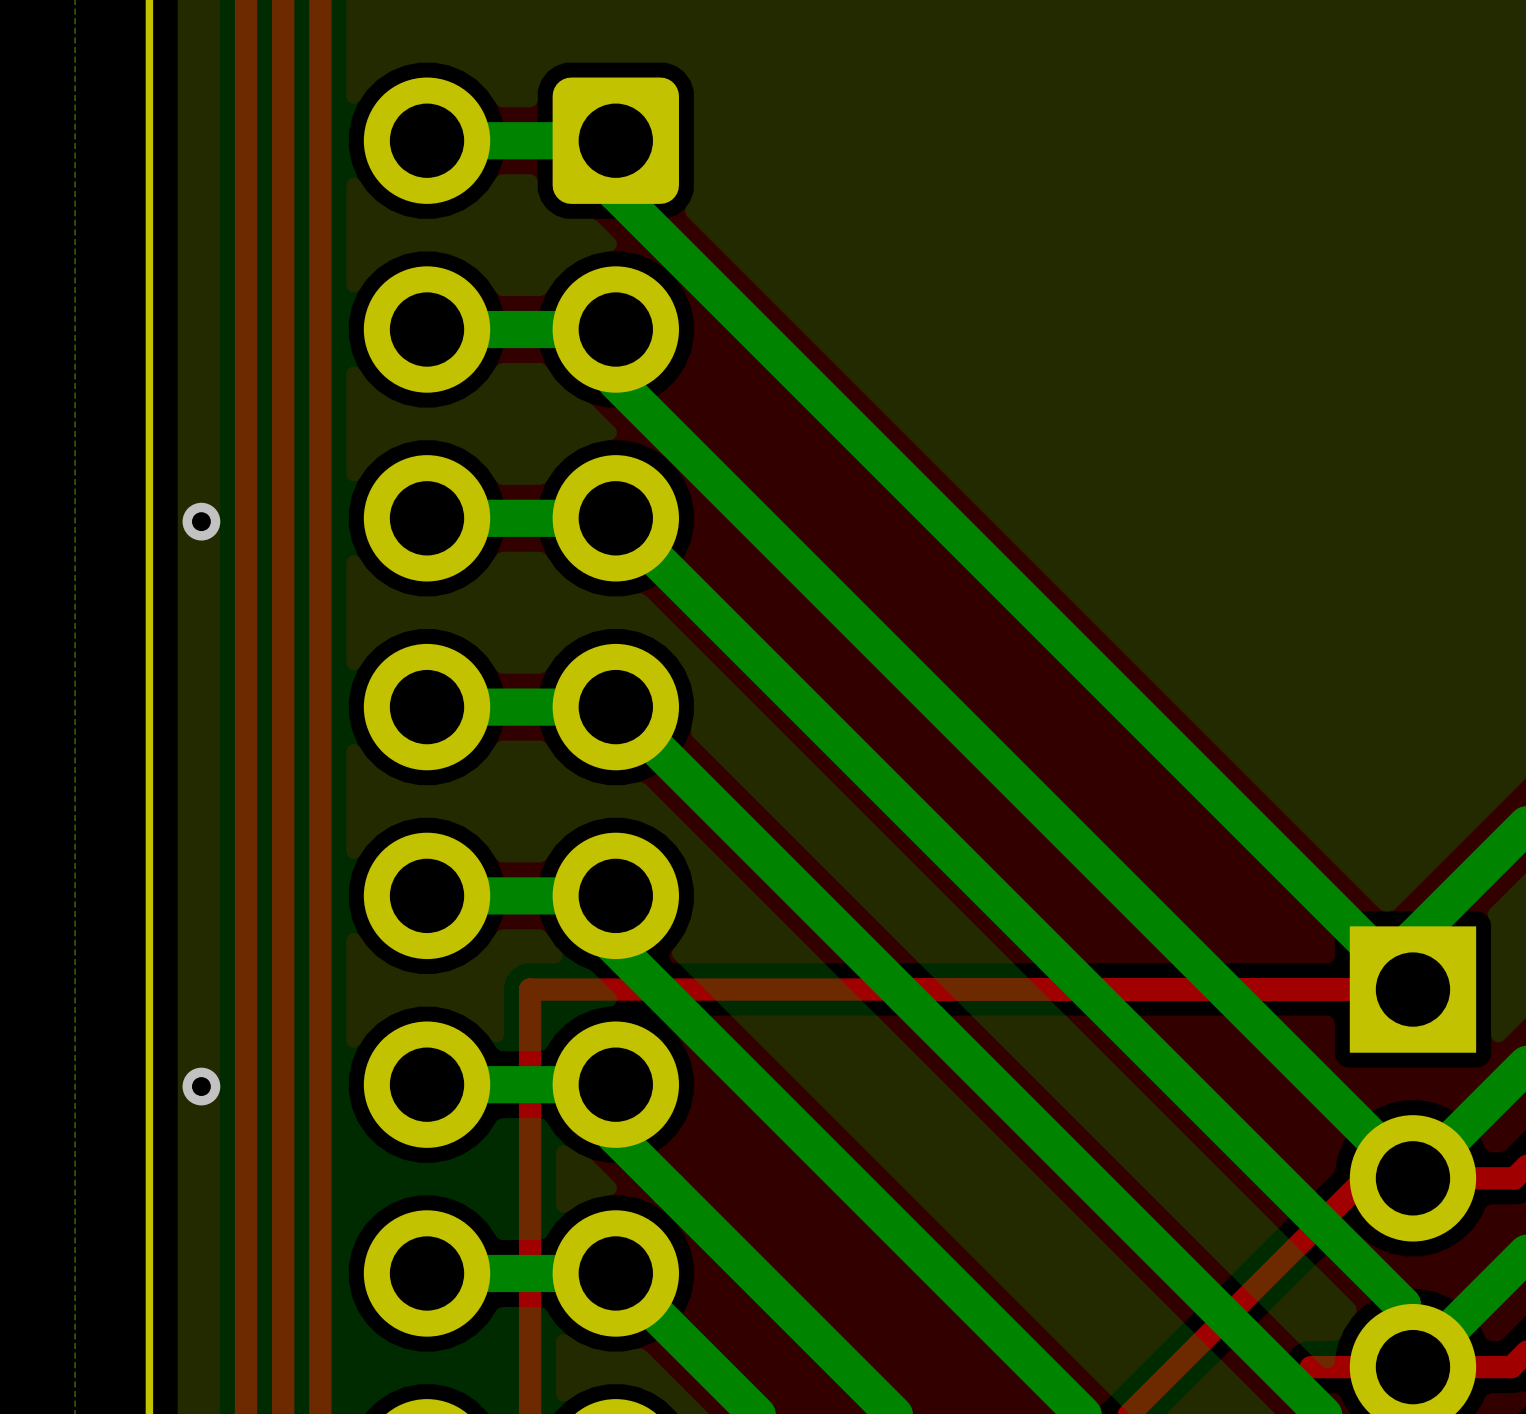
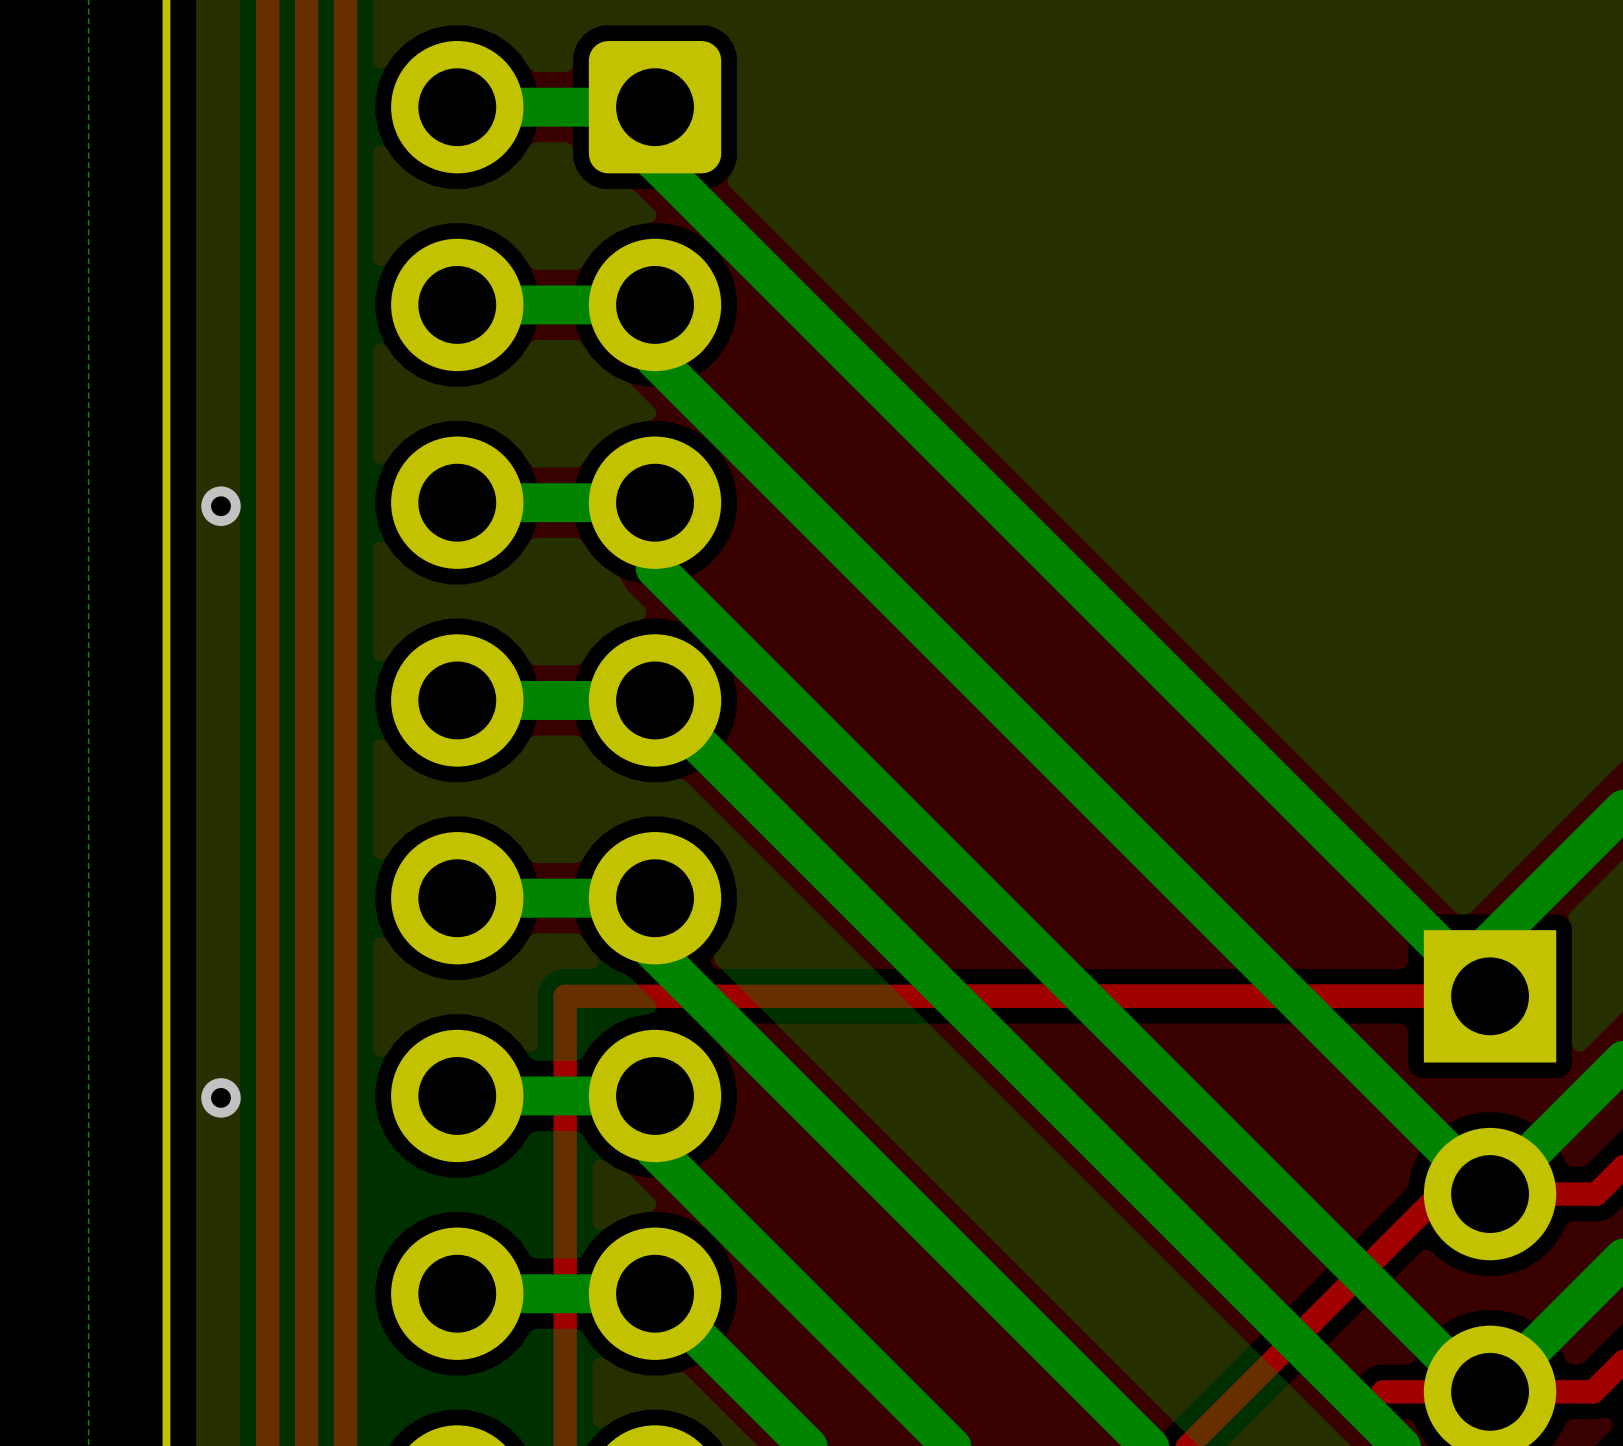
bottom track: (615, 518) (1402, 1304) (1402, 1367) -> (655, 502) (655, 568) (1478, 1391)

